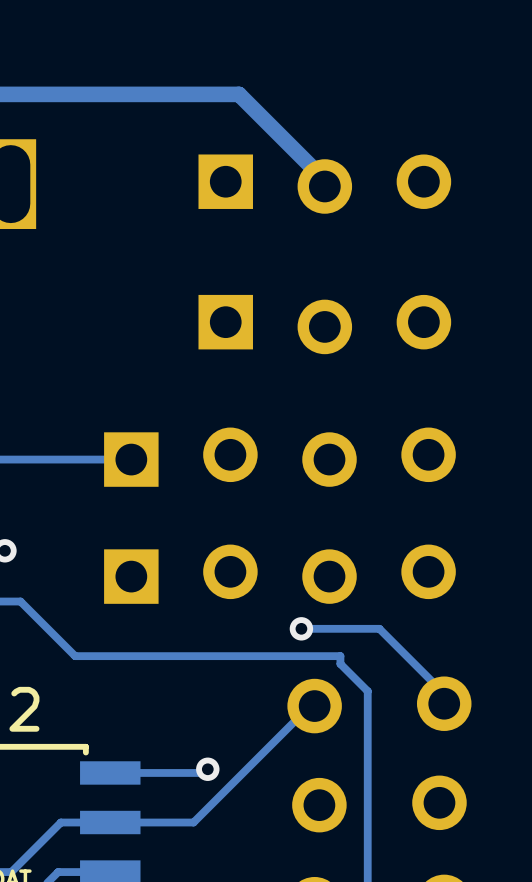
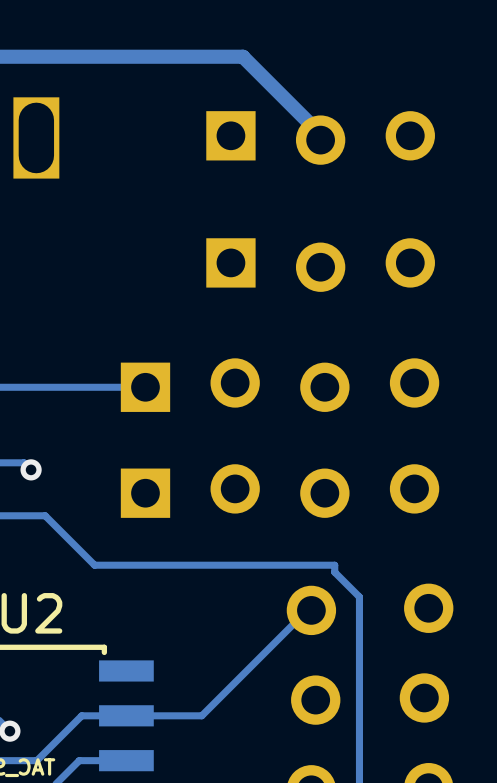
track: (301, 628) (379, 628) (444, 693) (444, 703) -> none
via: (301, 628) -> none
track: (207, 769) (204, 772) (110, 772) -> none
via: (207, 769) -> none

